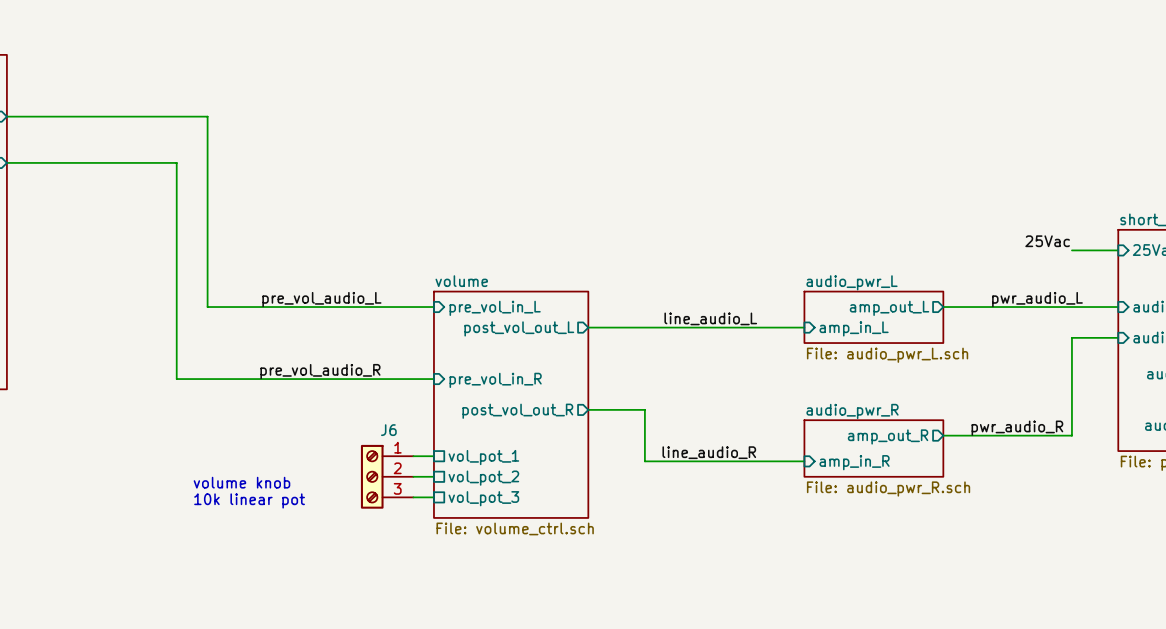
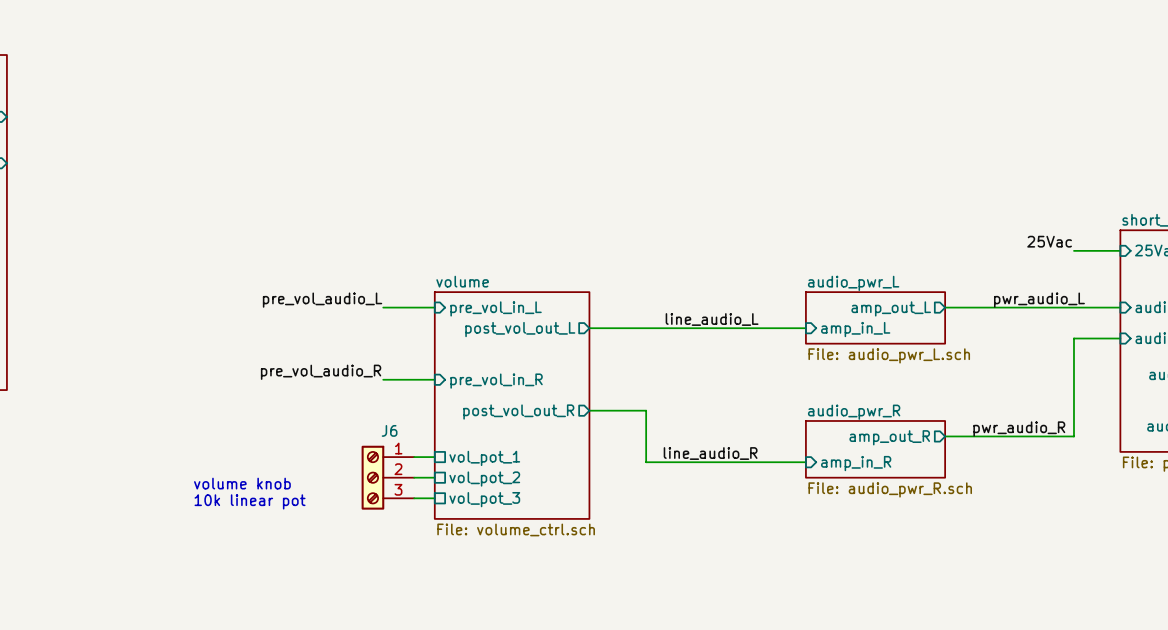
wire: (6, 116) (207, 116) (207, 307) (382, 307) -> none
wire: (6, 162) (176, 162) (176, 379) (382, 379) -> none

